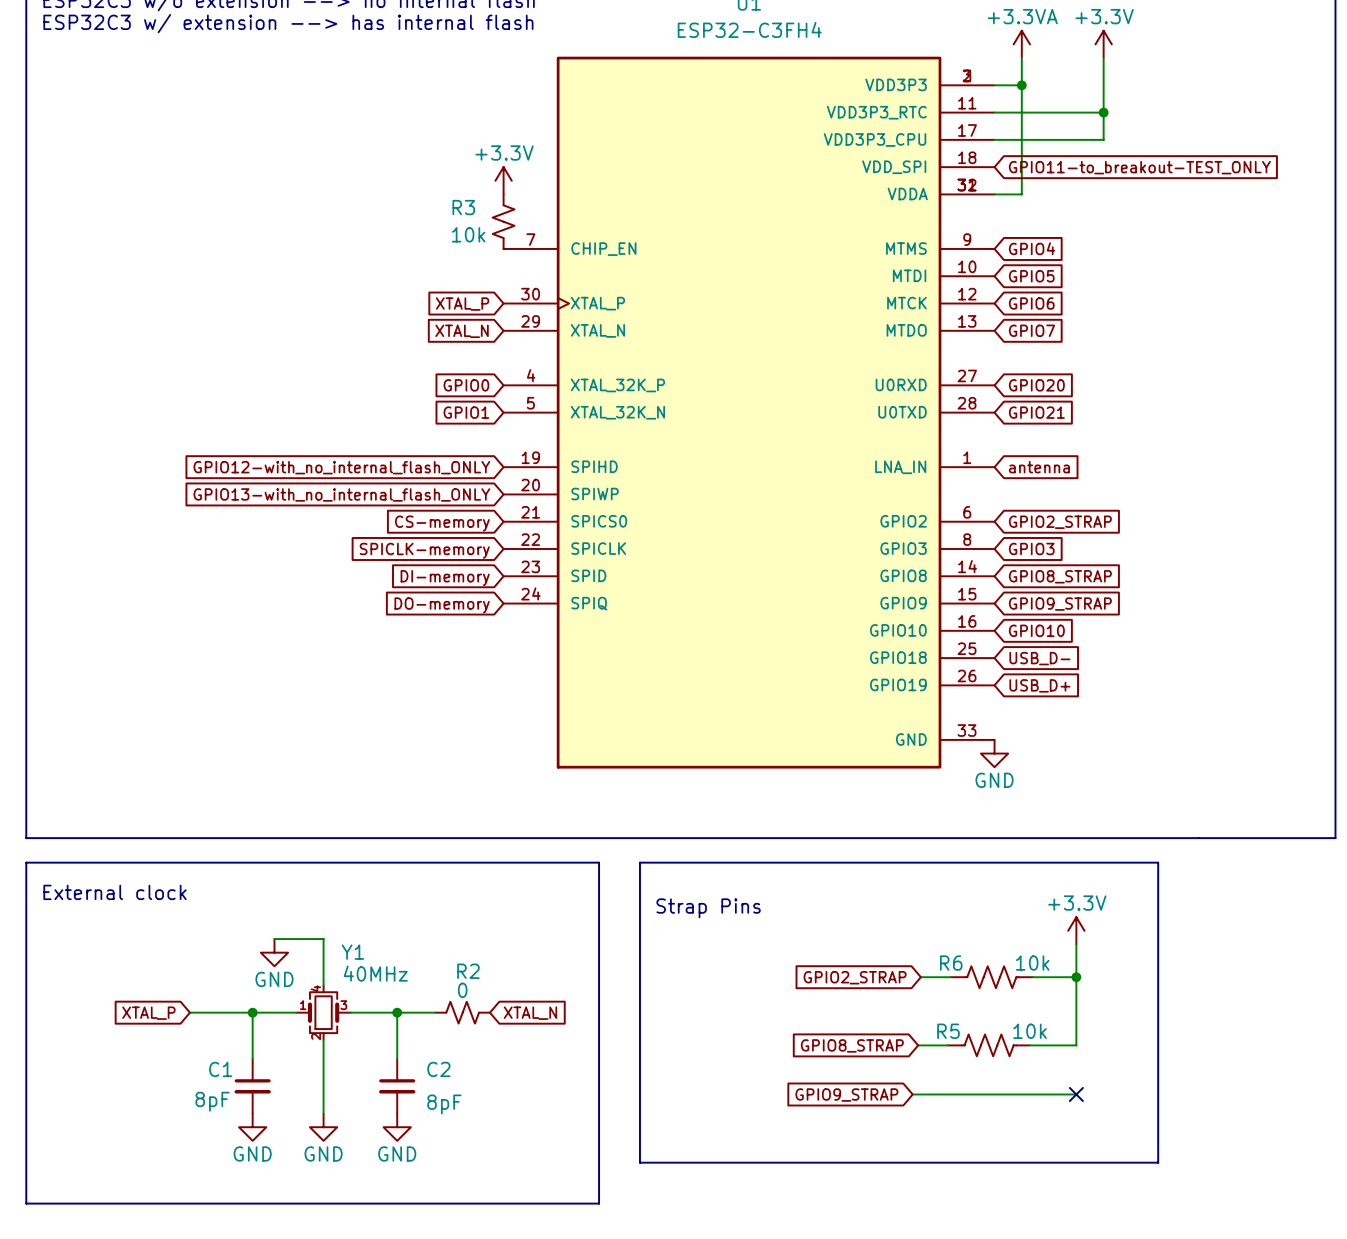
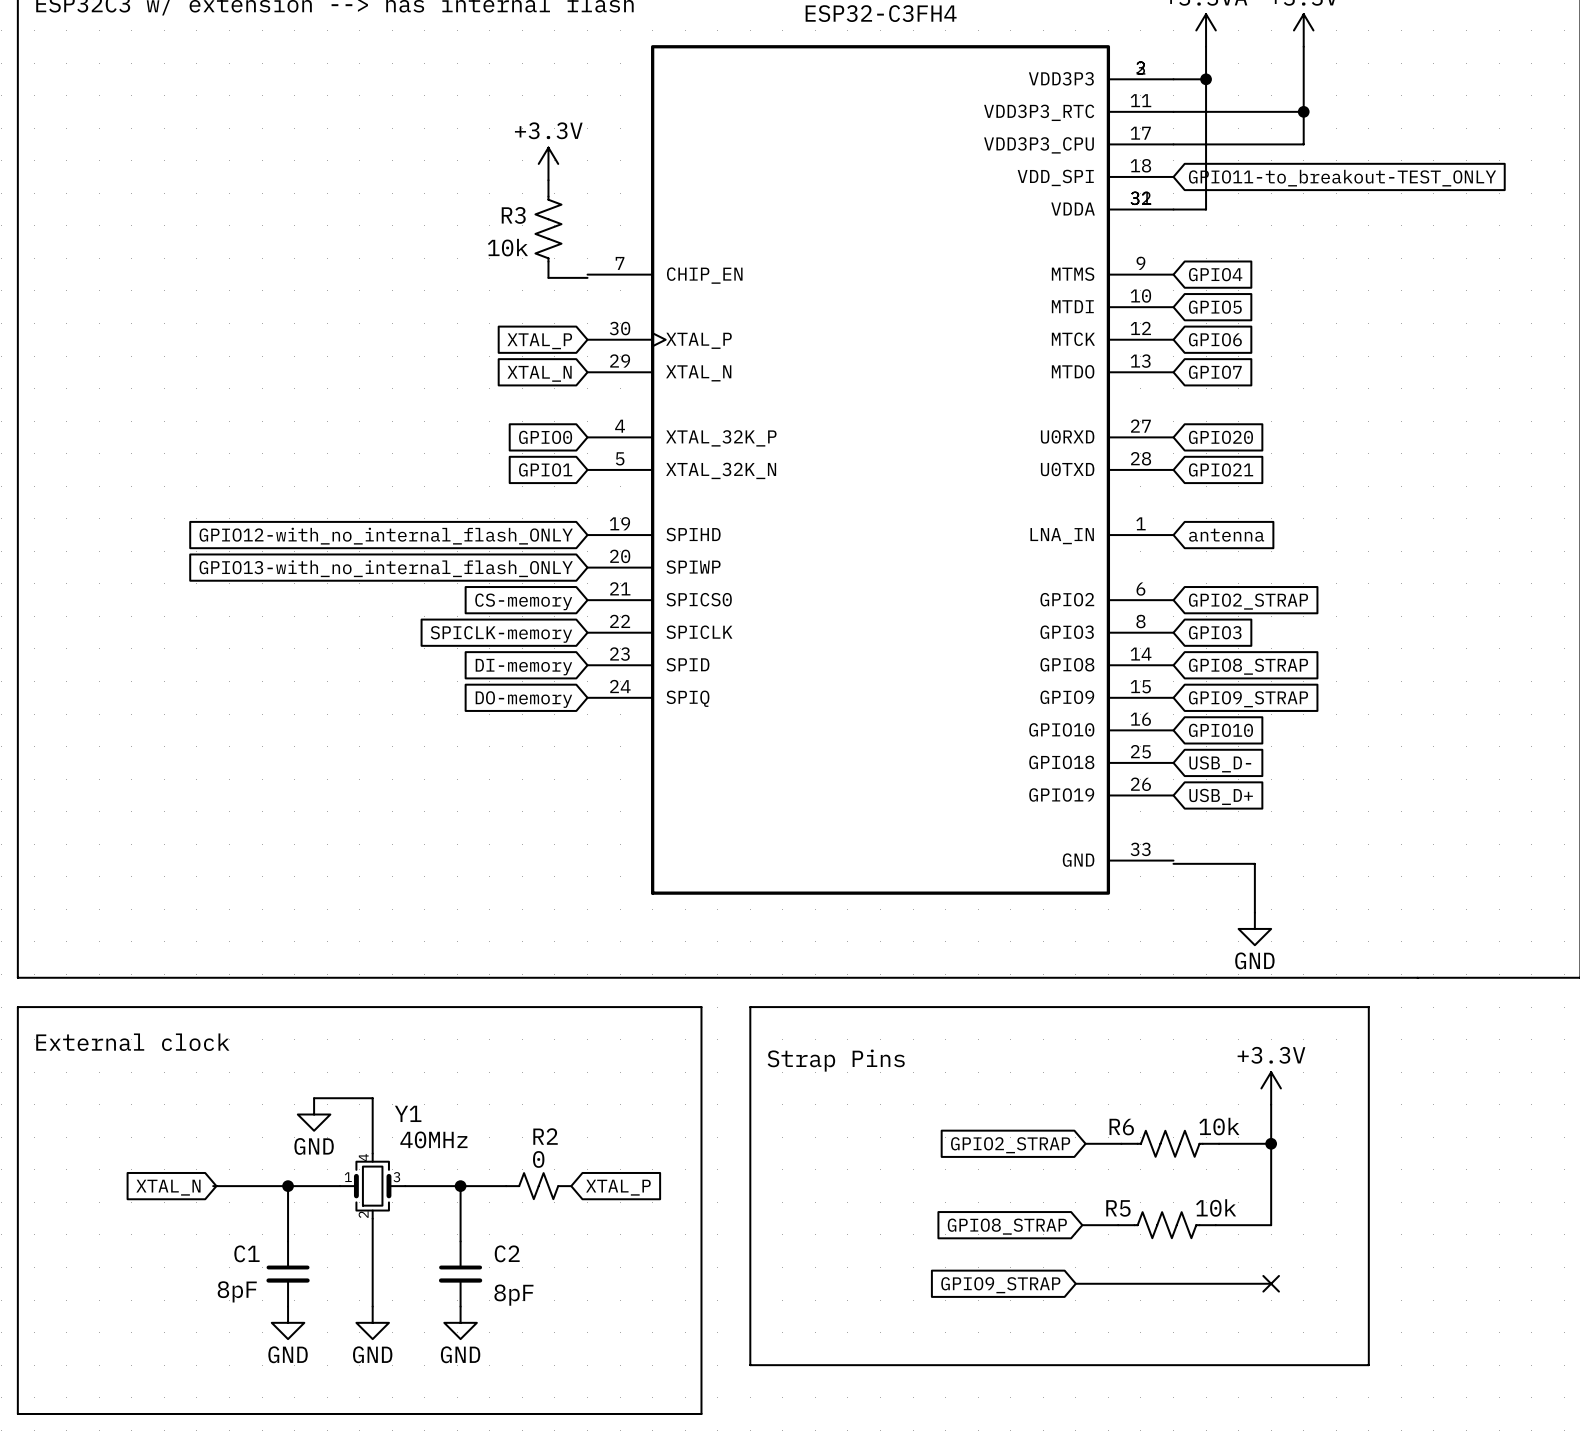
power symbol position: +3.3V (503, 180) -> +3.3V (548, 163)
R3 symbol: [492, 194, 515, 249] -> [535, 180, 562, 278]
wire: none -> (548, 277) (587, 277)
wire: none -> (1173, 863) (1254, 863) (1254, 912)
power symbol position: GND (994, 753) -> GND (1254, 928)
global label: XTAL_P (148, 1013) -> XTAL_N (168, 1187)
global label: XTAL_N (530, 1013) -> XTAL_P (618, 1187)

